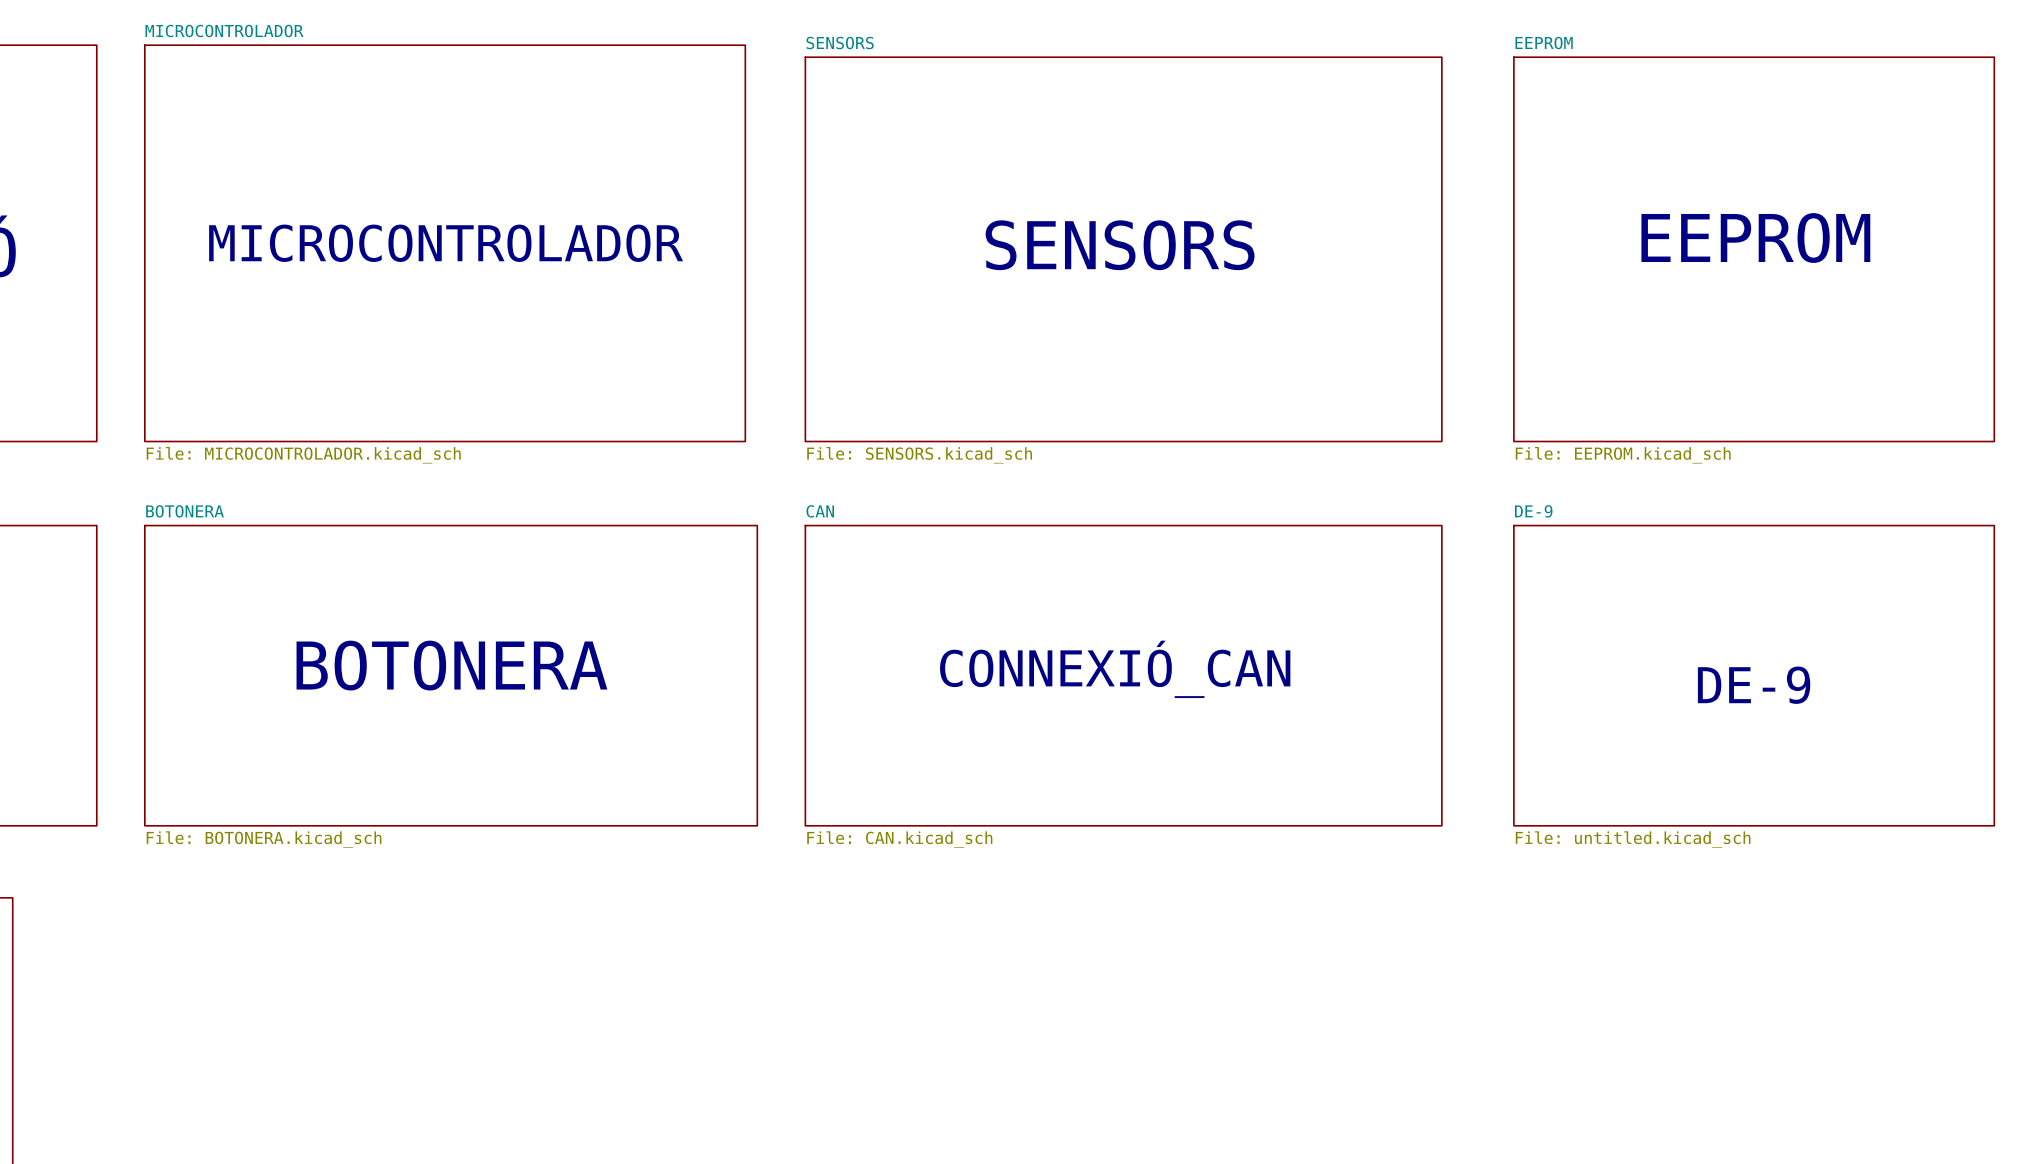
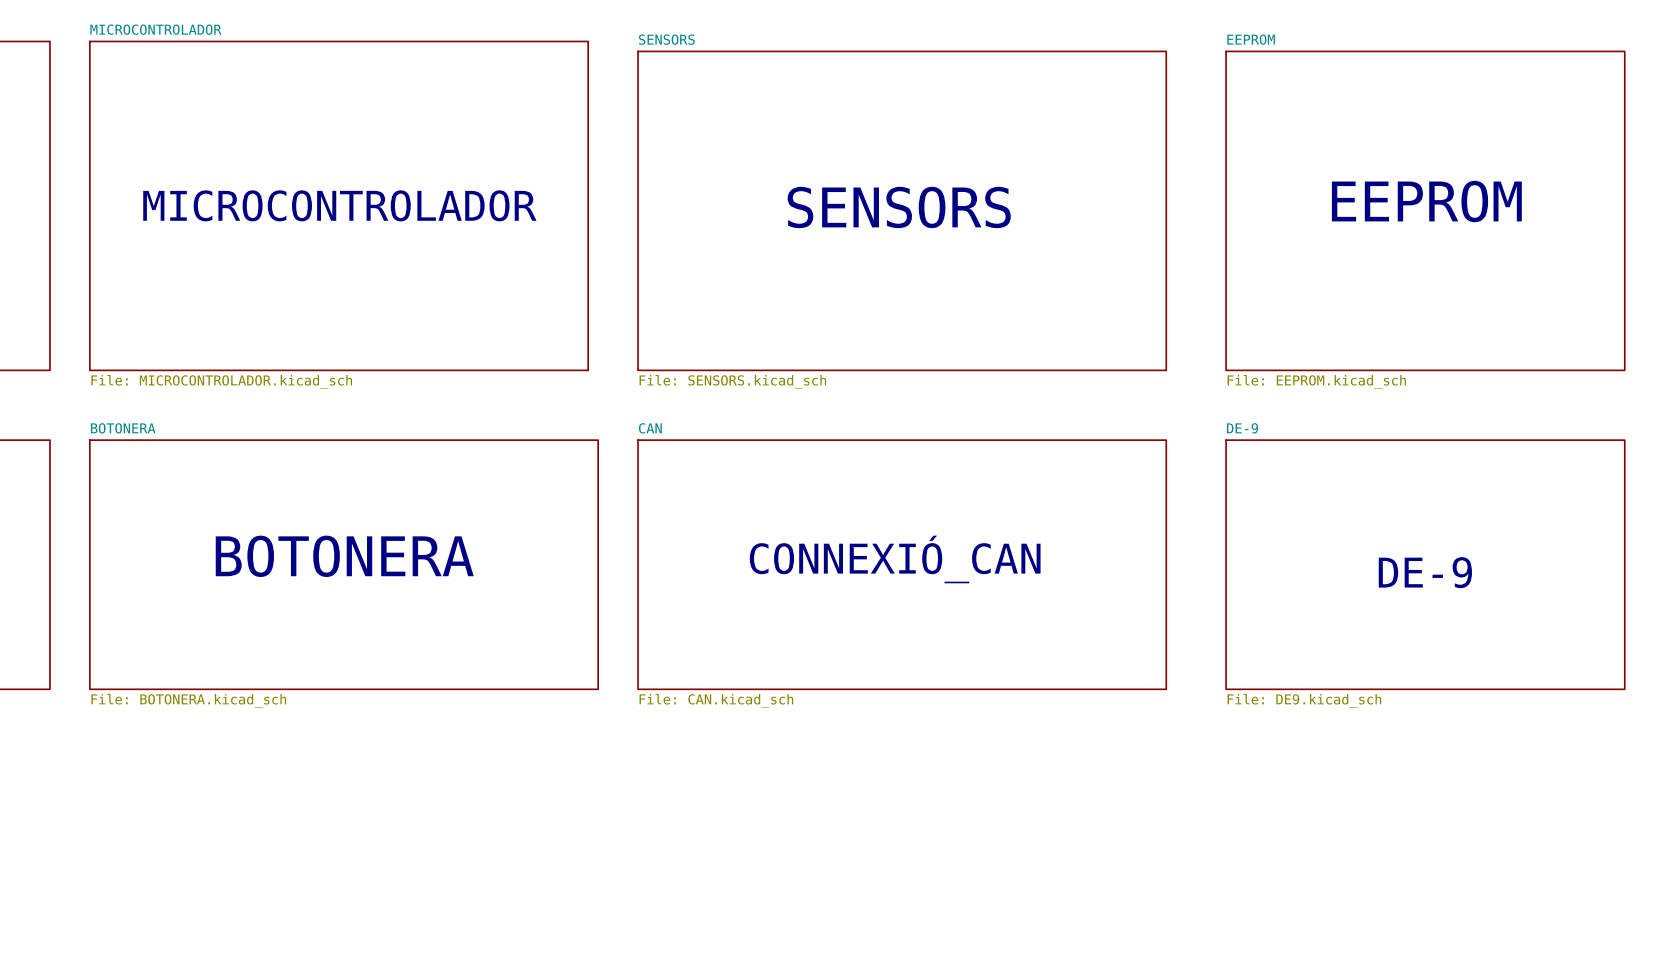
sheet DE-9 value: File: untitled.kicad_sch (1633, 839) -> File: DE9.kicad_sch (1304, 700)

